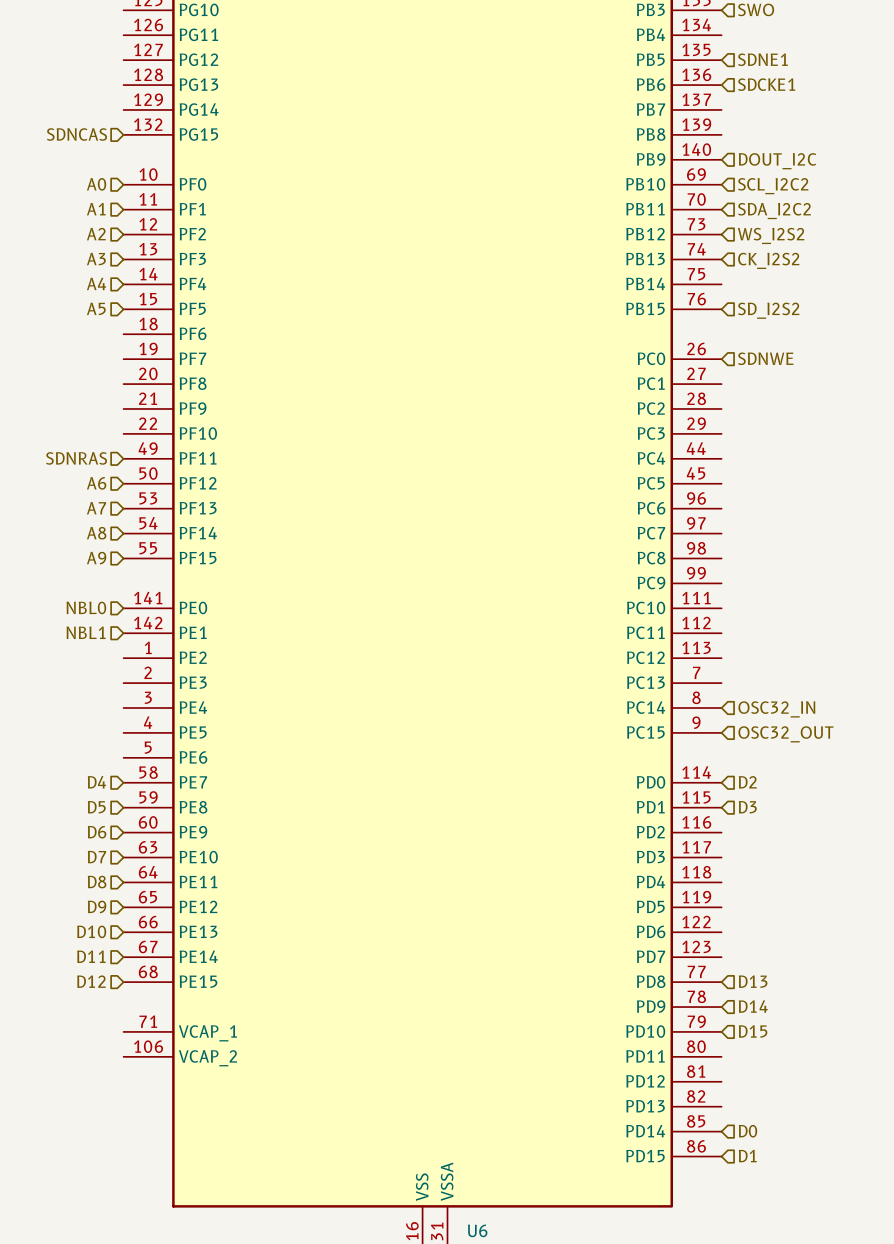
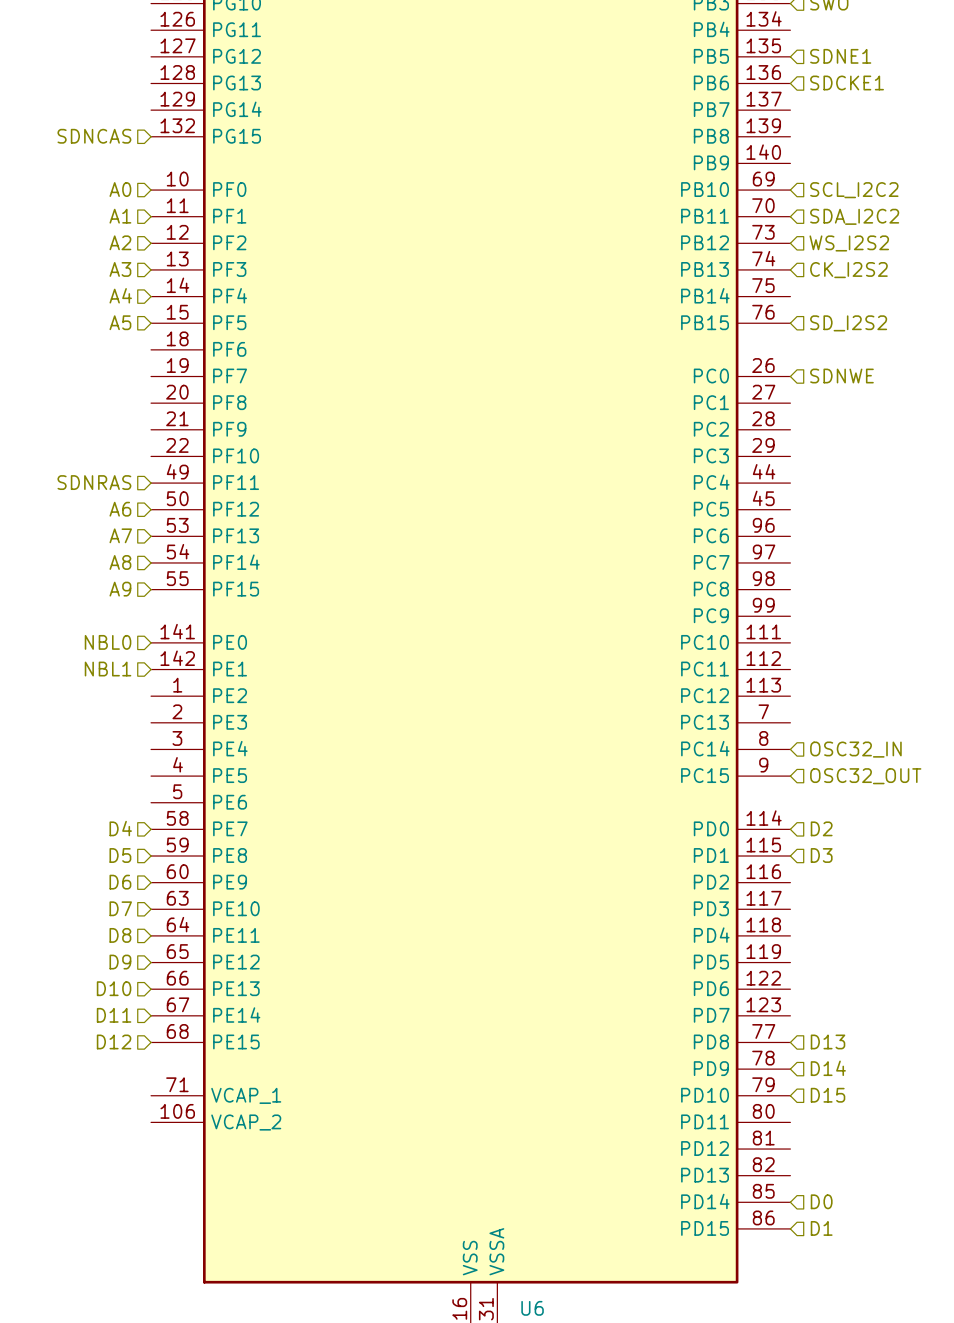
hierarchical label: DOUT_I2C (777, 161) -> none

